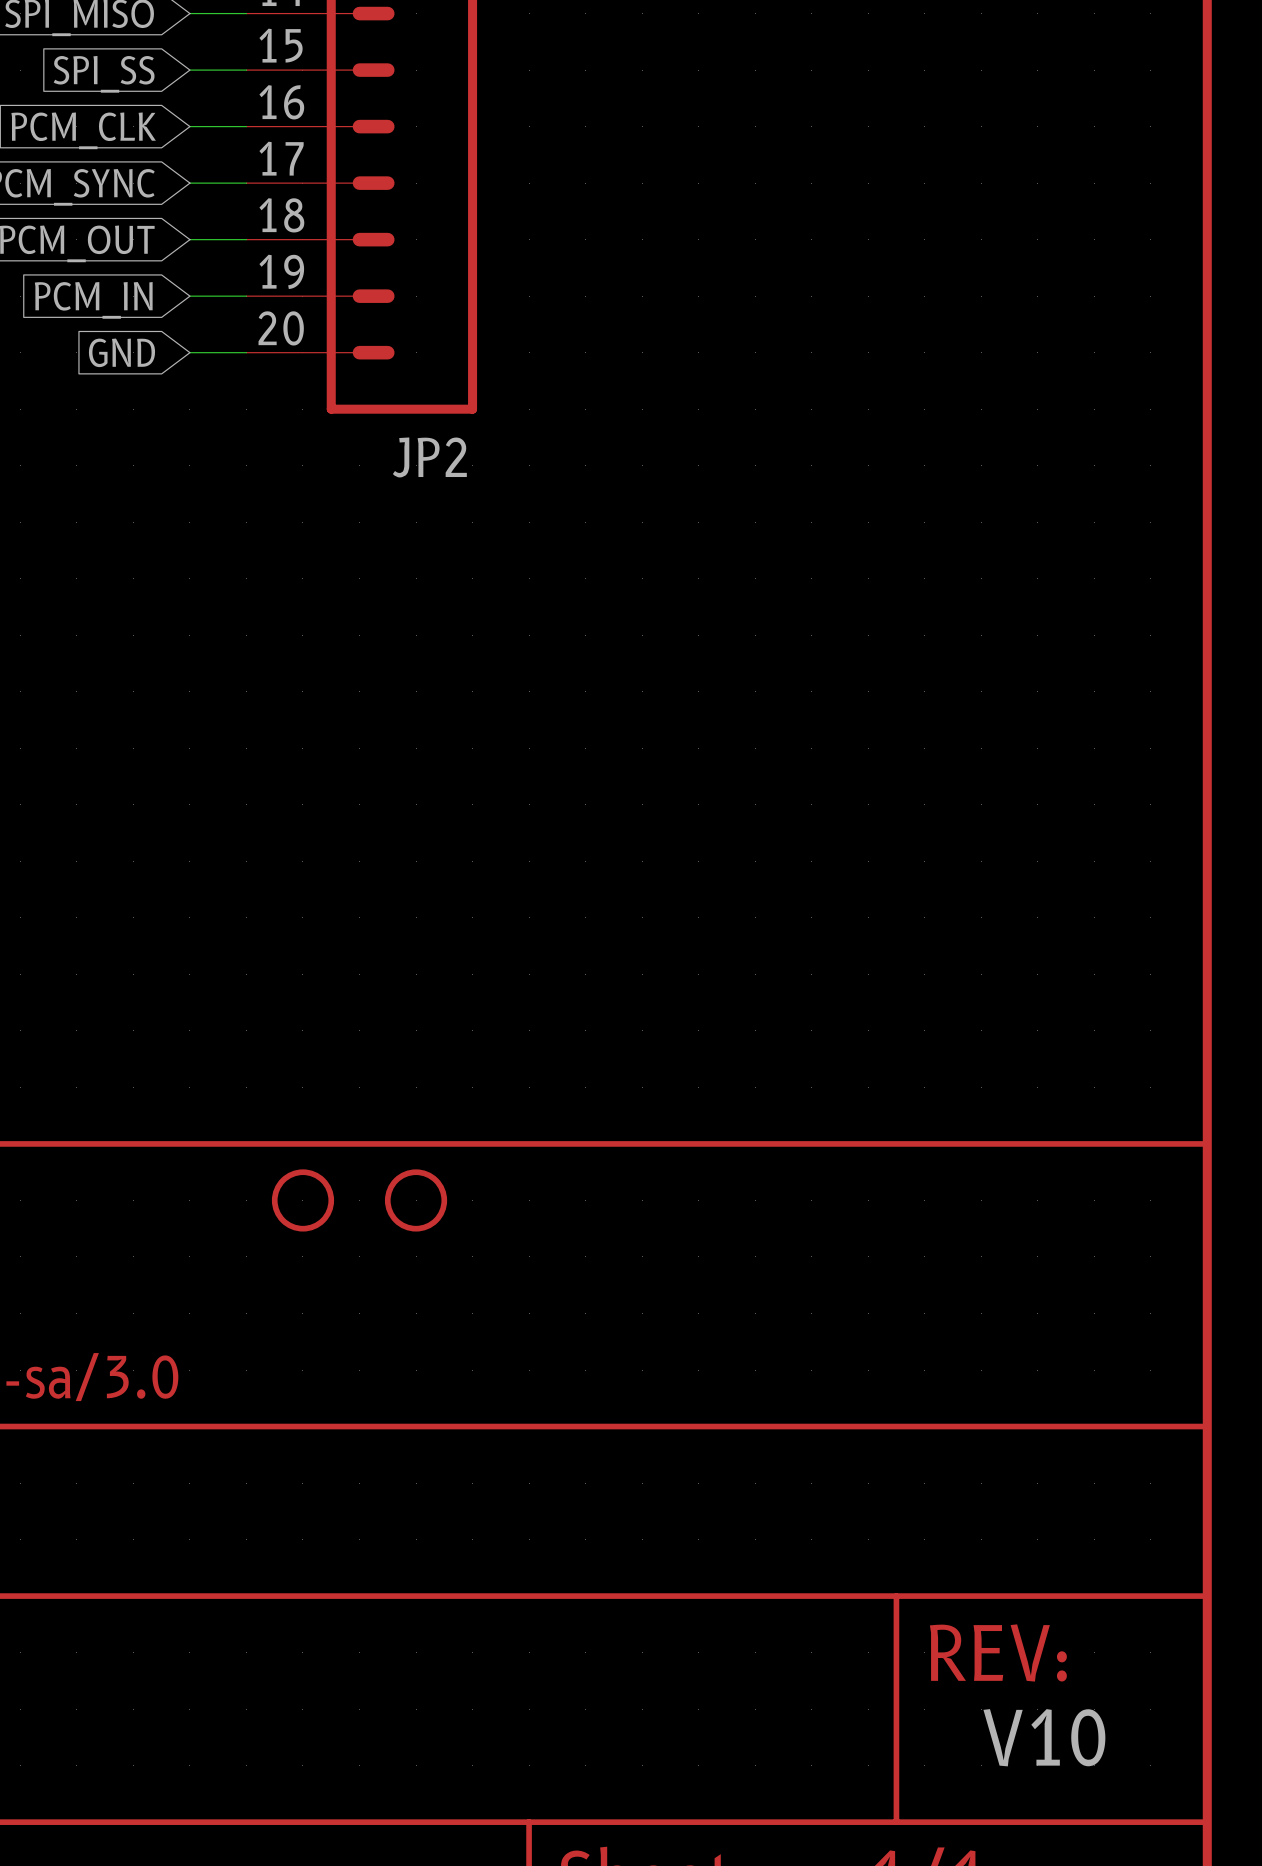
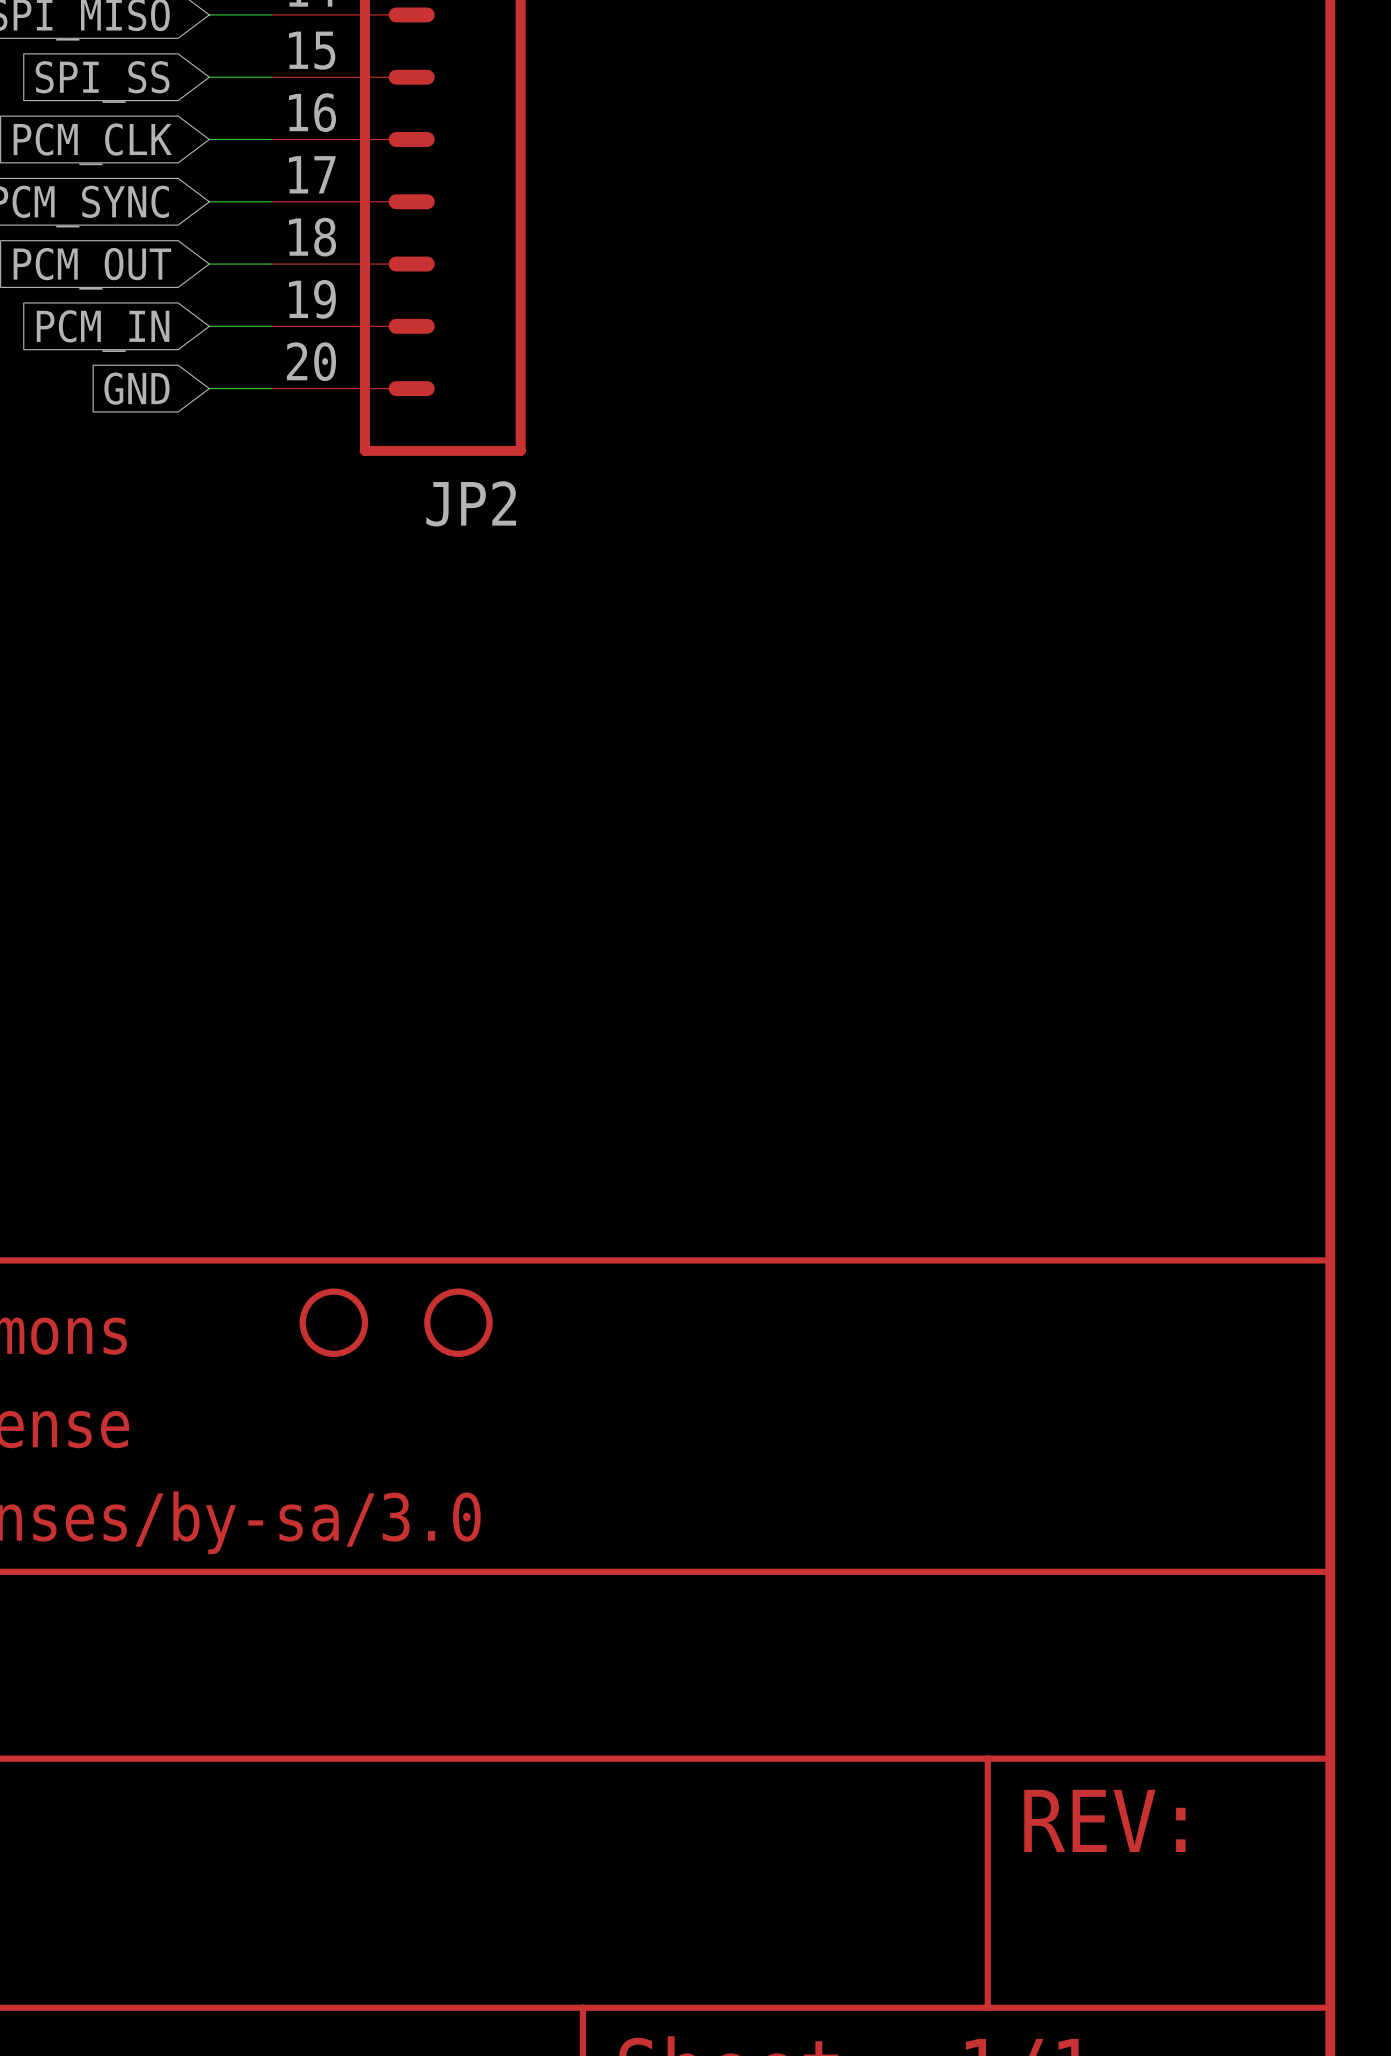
text: V10 (1044, 1737) -> none

